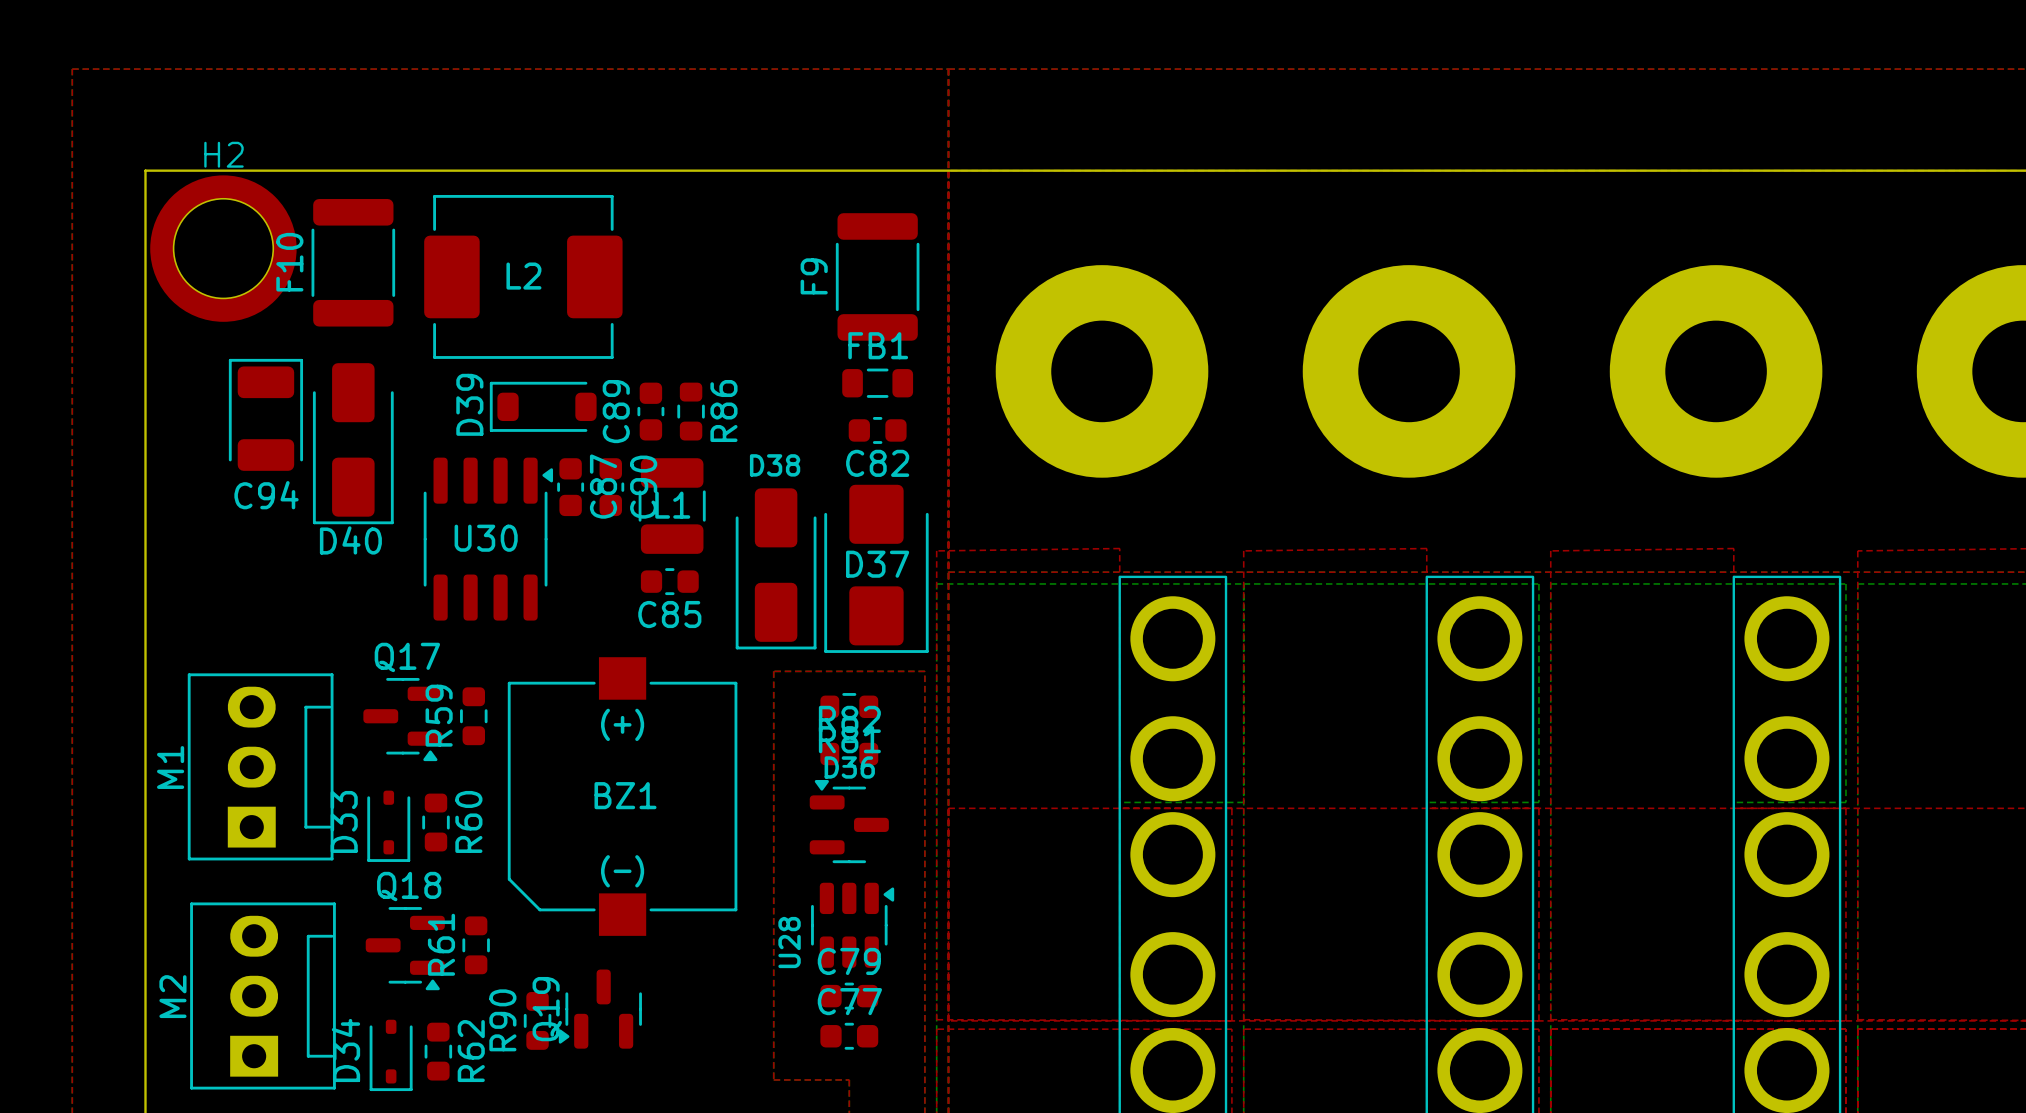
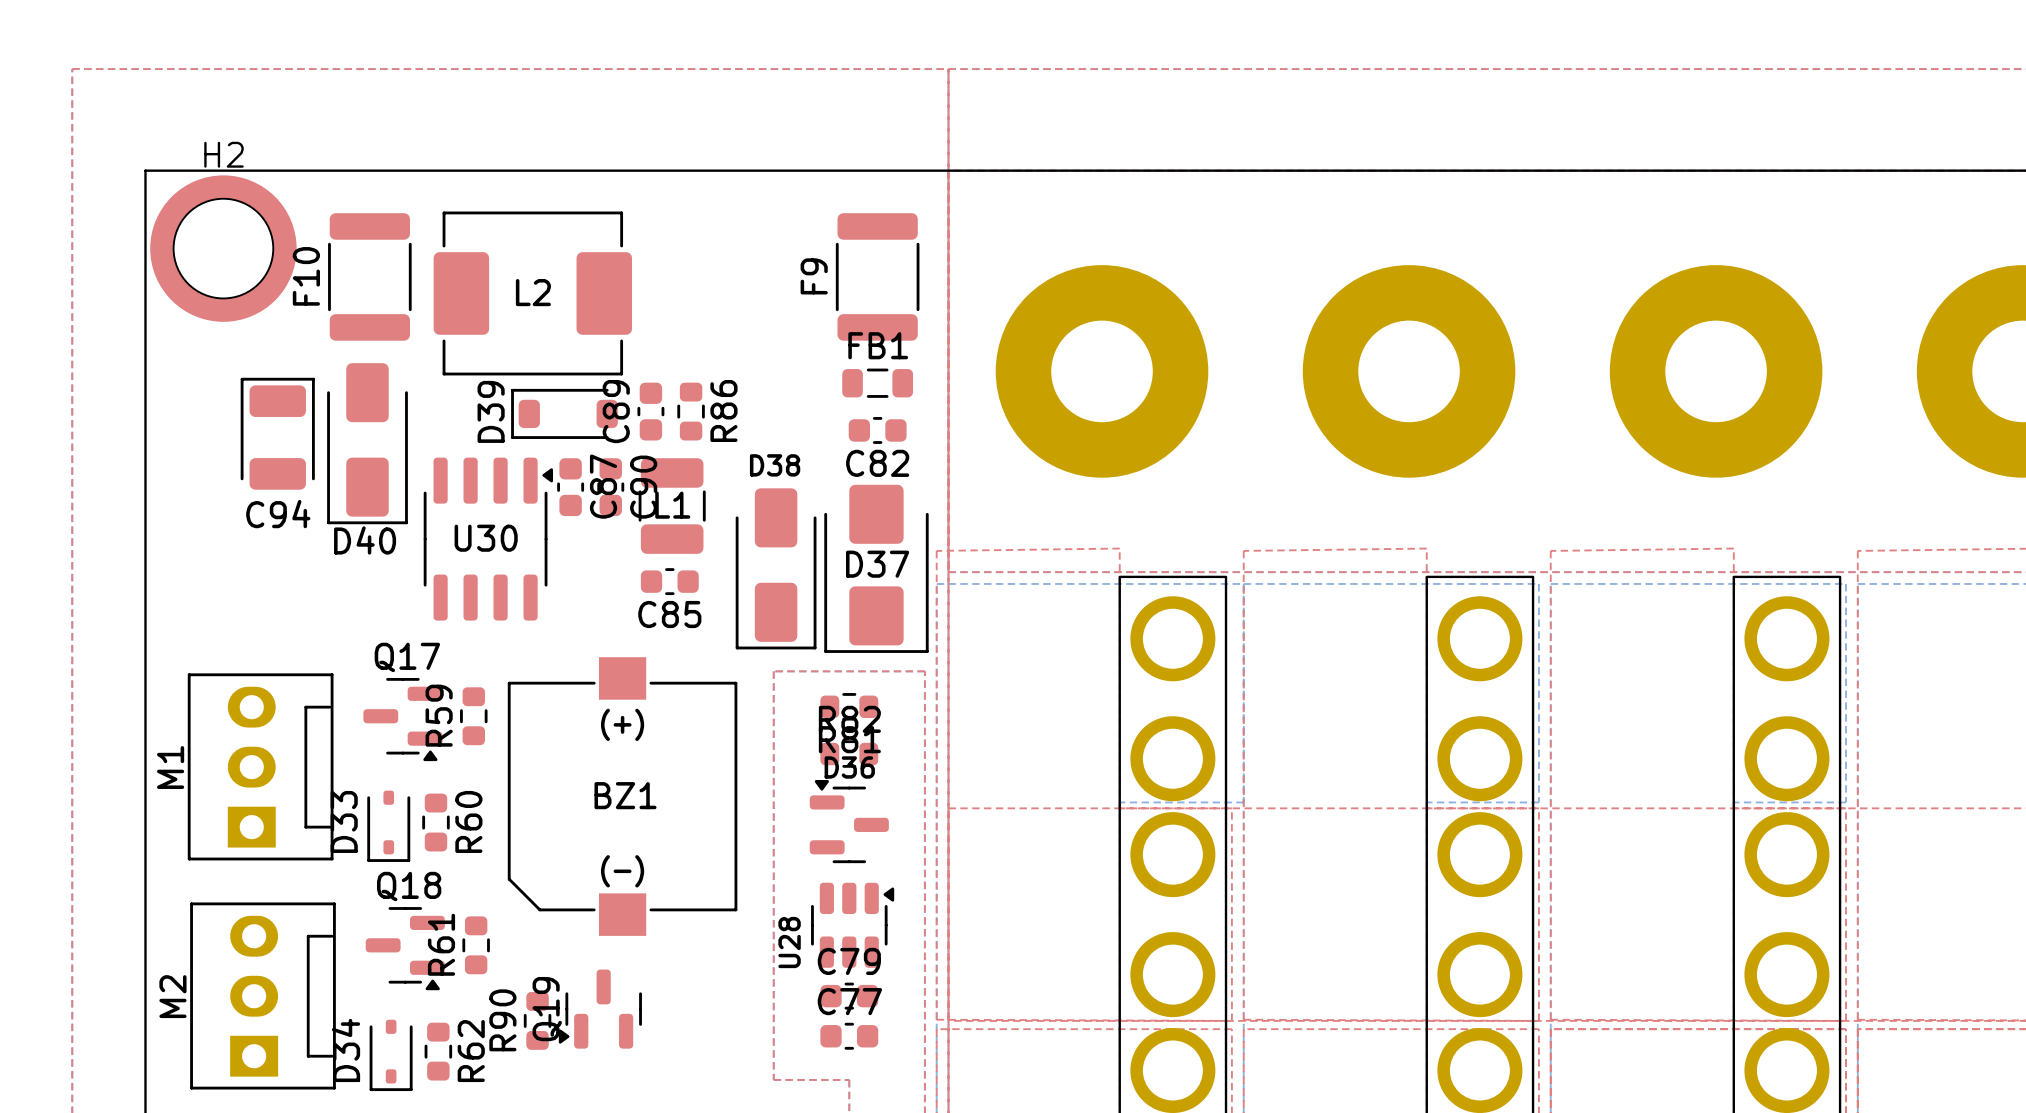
F10 position: (353, 262) -> (369, 276)
L2 position: (523, 276) -> (532, 293)
D39 position: (543, 406) -> (564, 413)
C94 position: (265, 414) -> (277, 433)
D40 position: (353, 443) -> (367, 443)

